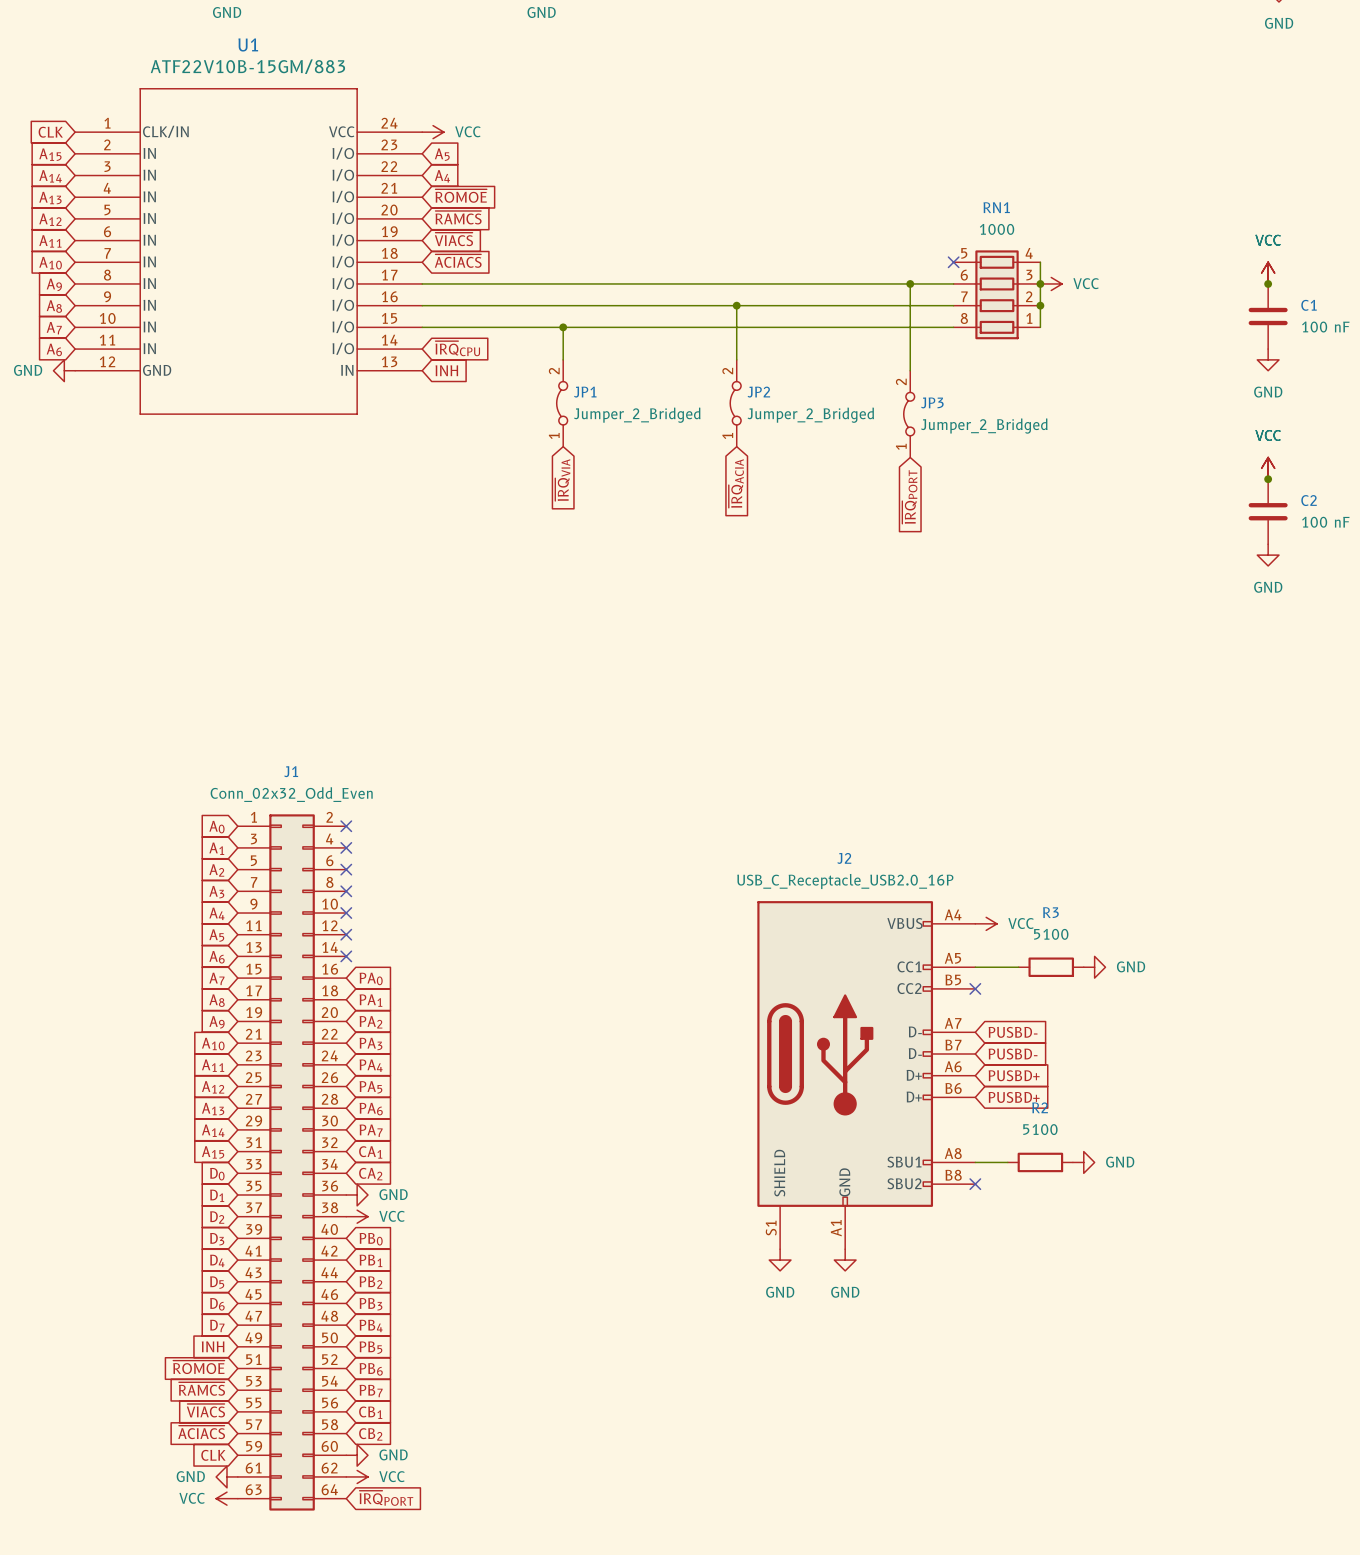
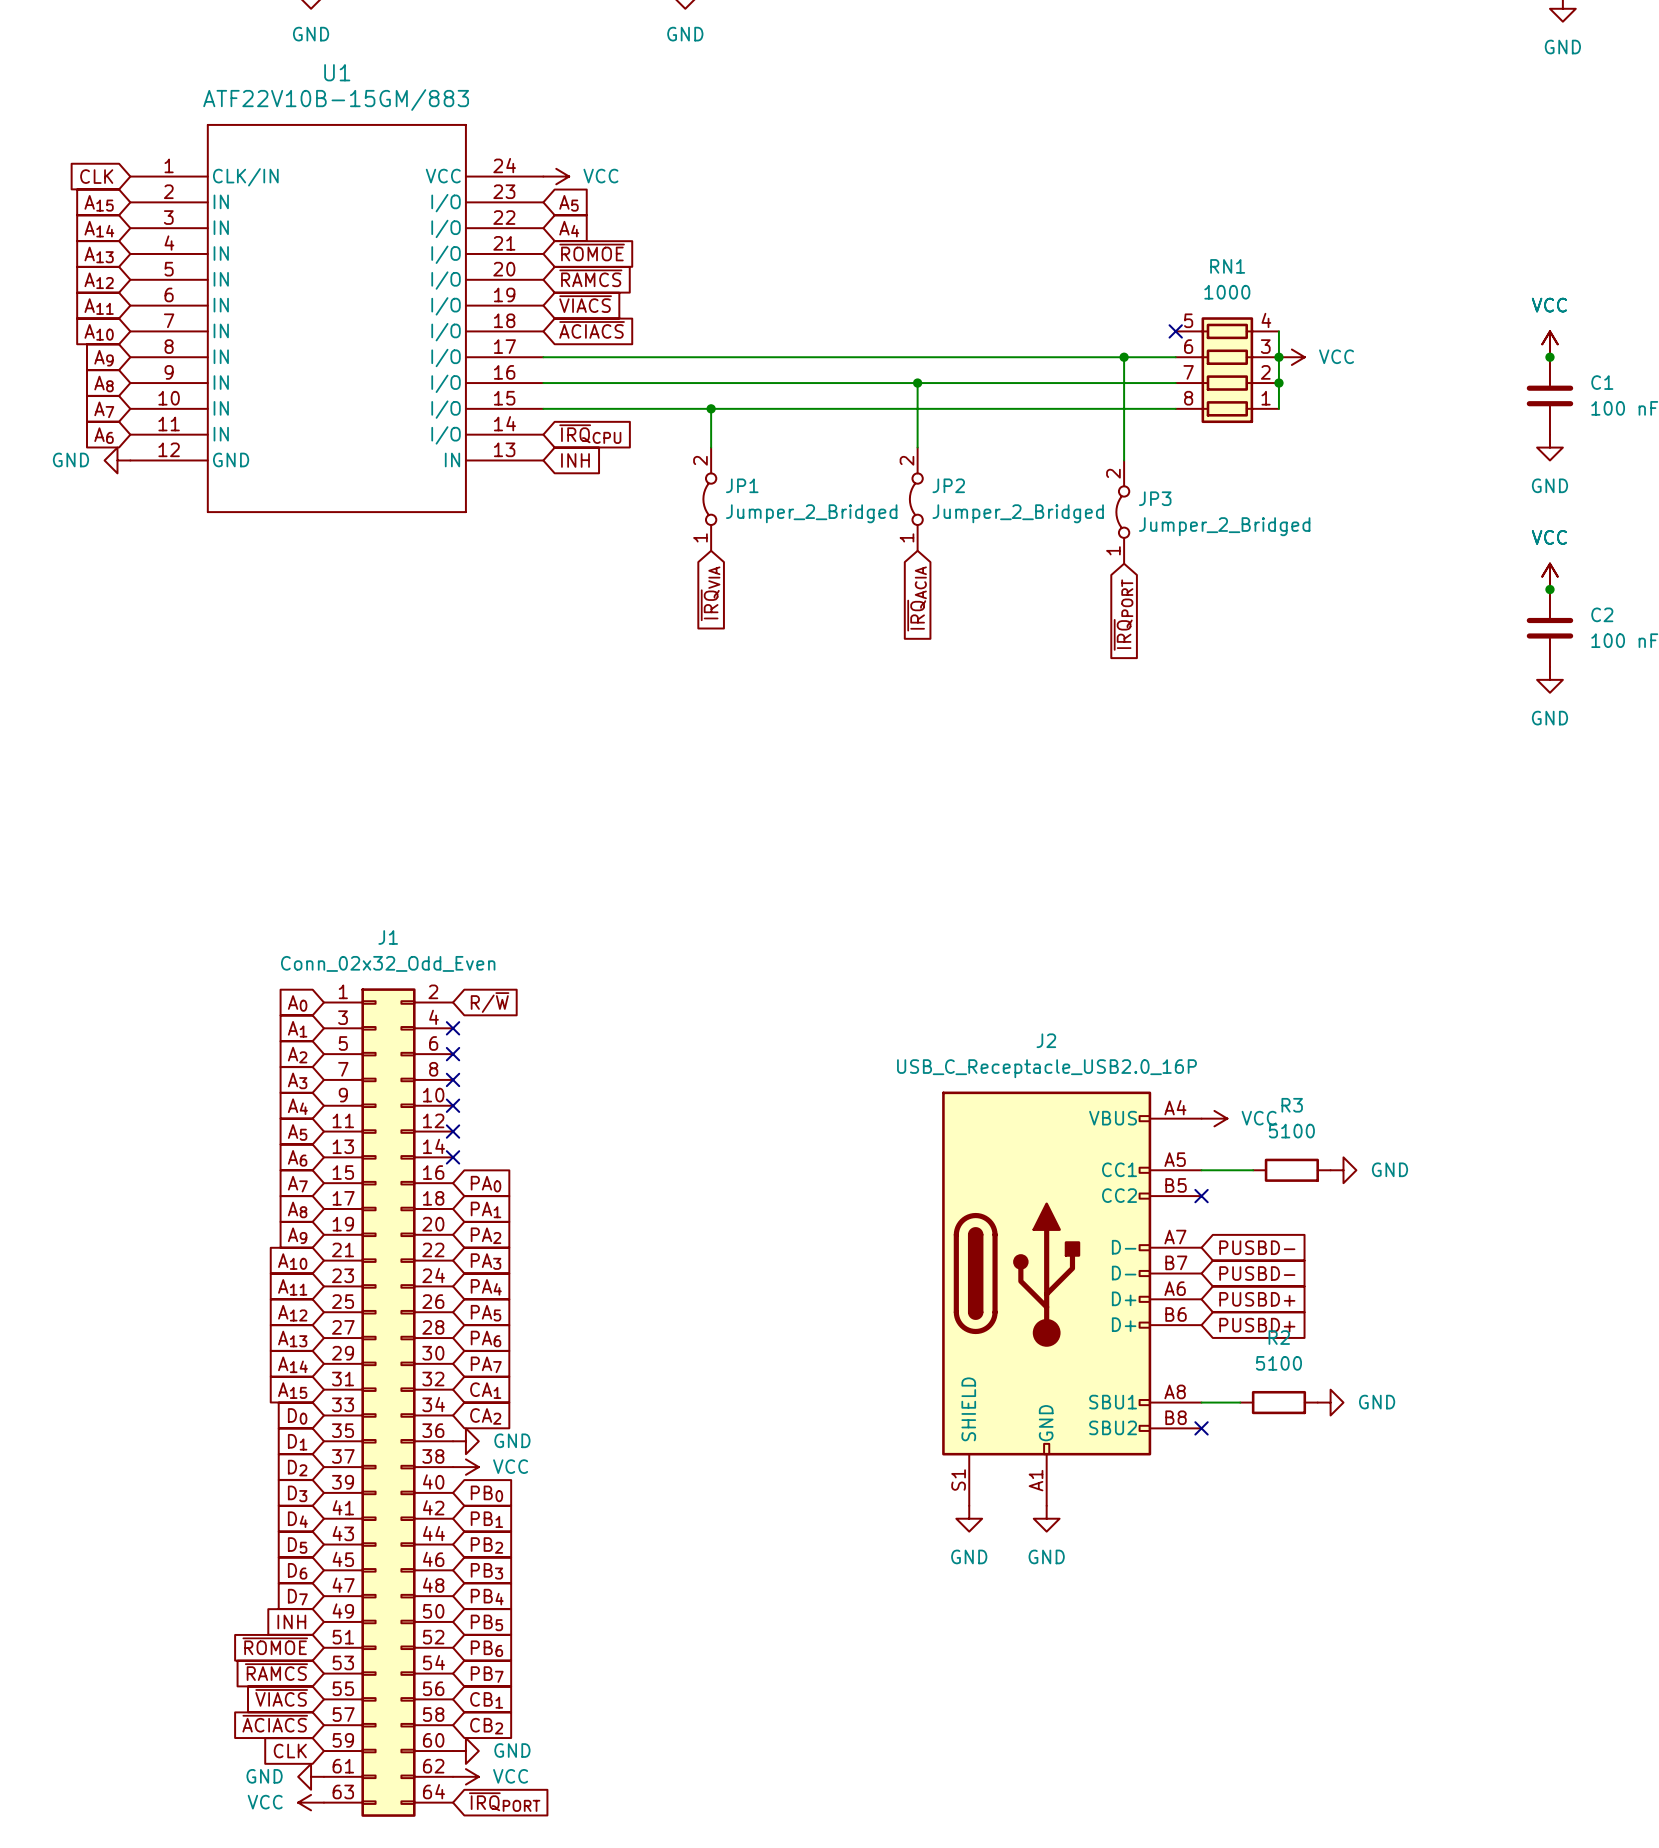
global label: none -> R/~{W} (490, 1002)
no-connect mark: (346, 826) -> none

